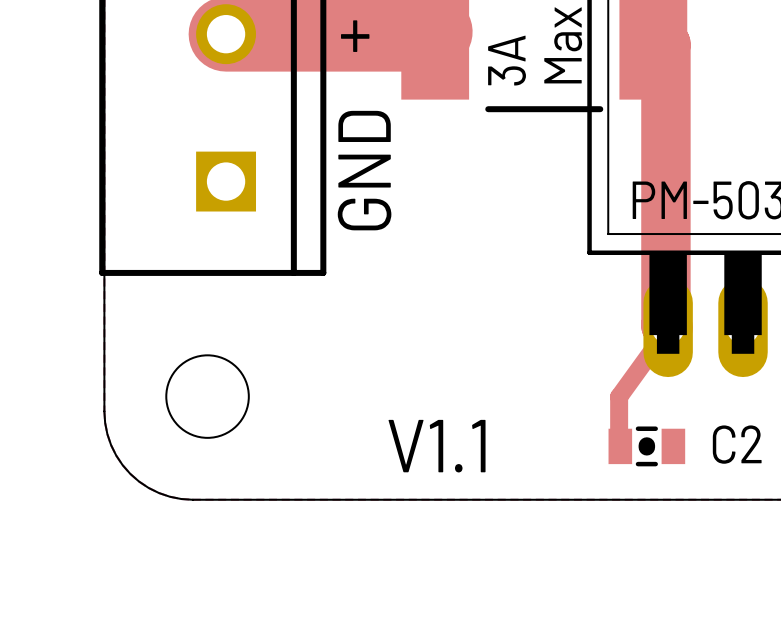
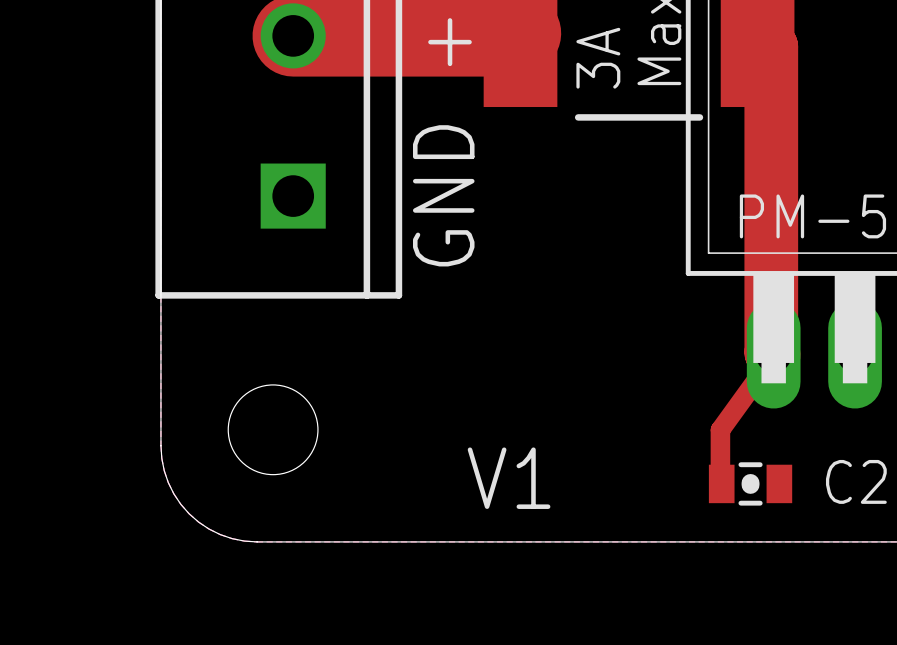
text: V1.1 (437, 446) -> V1 (509, 478)

